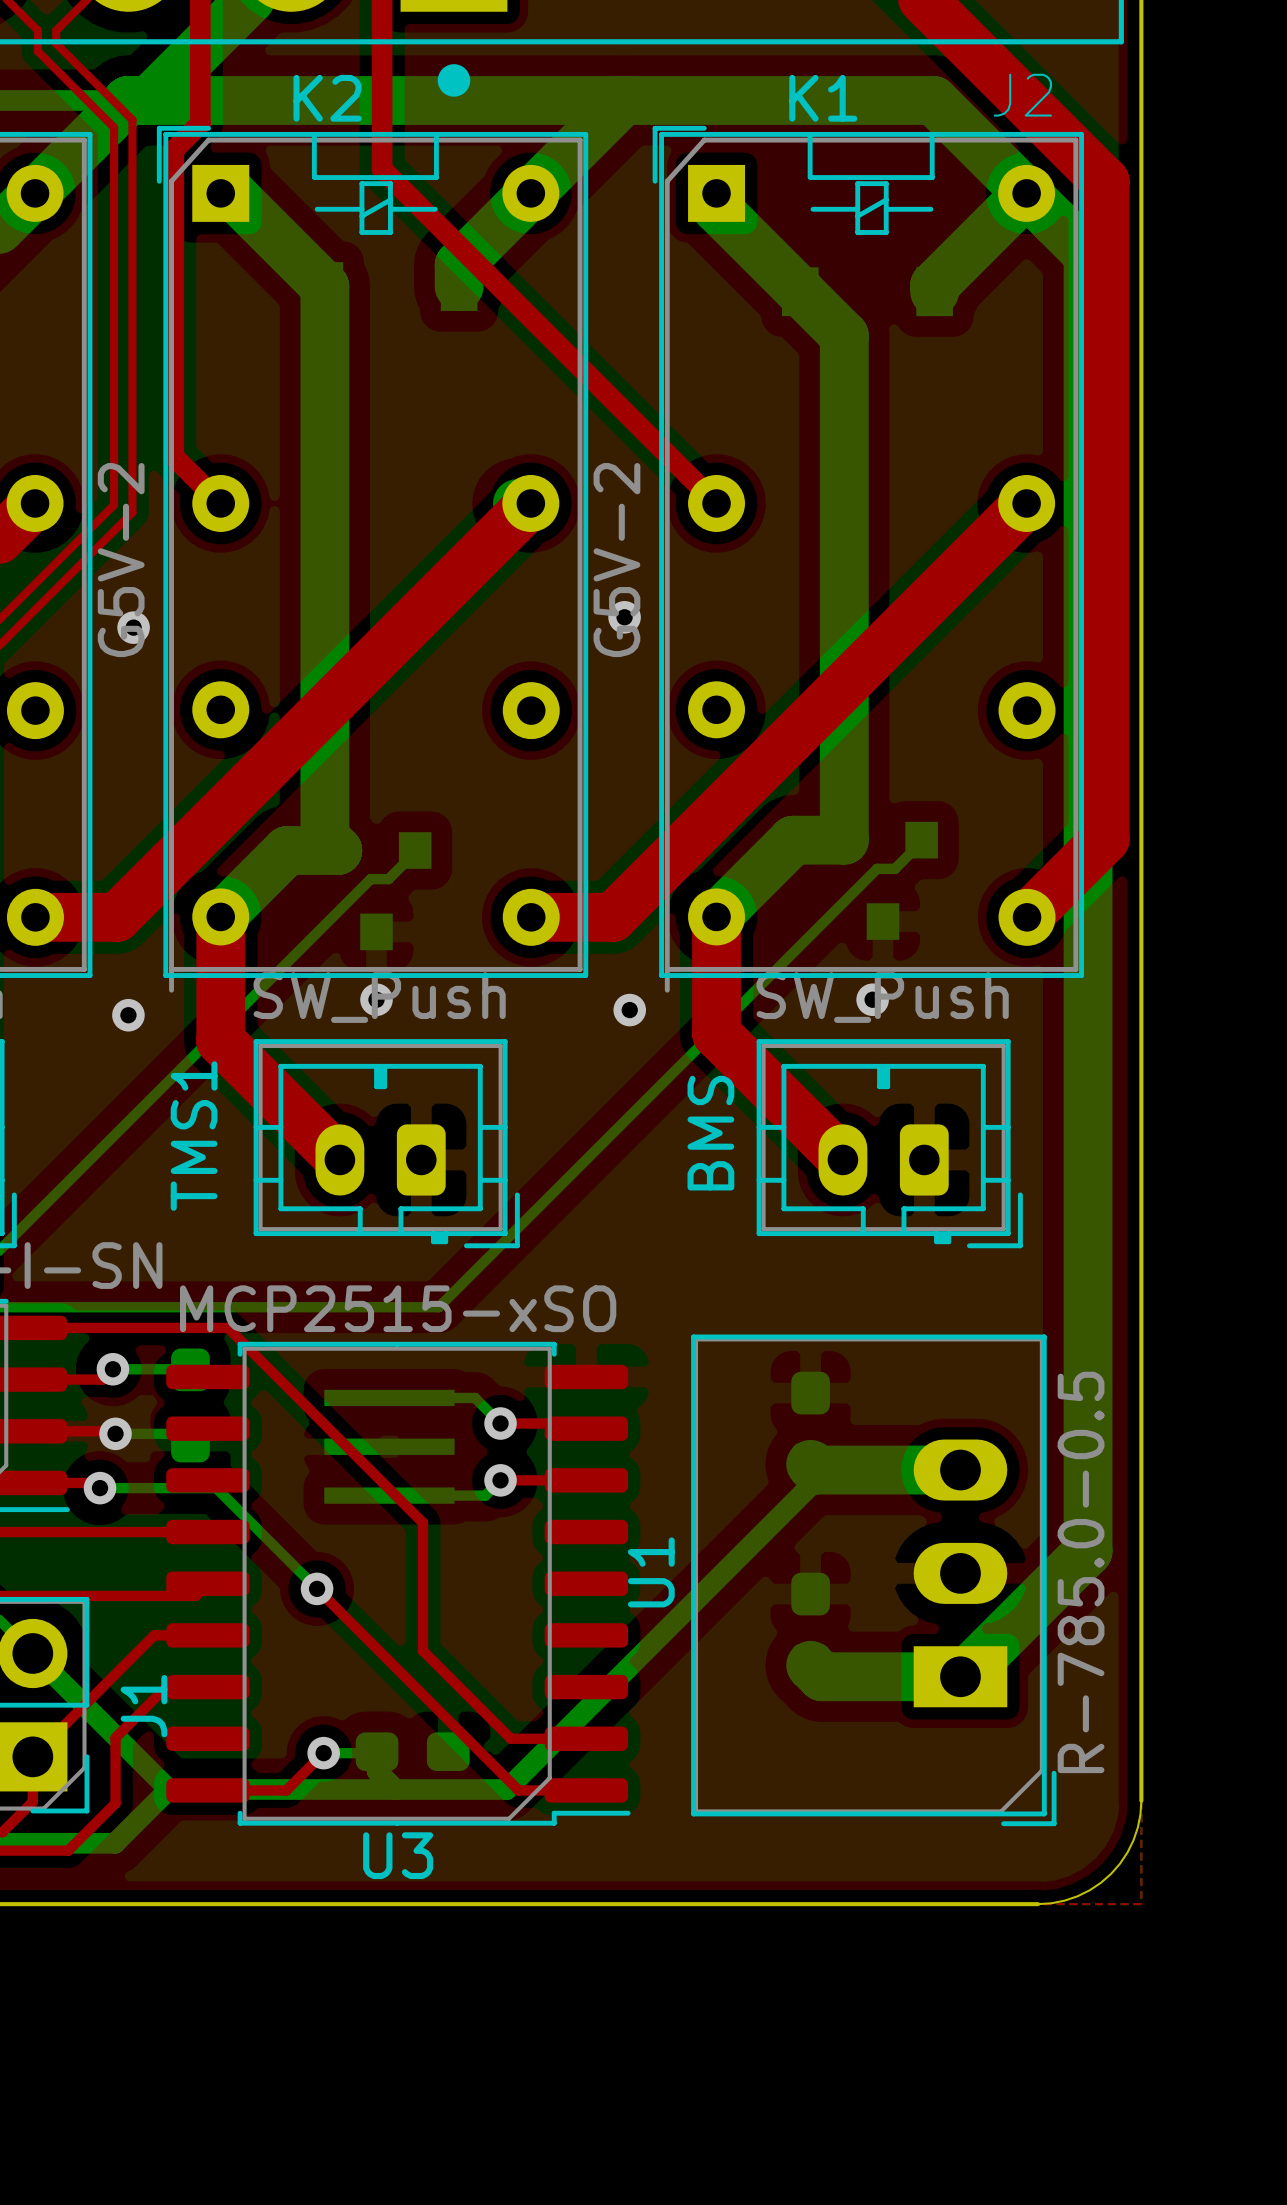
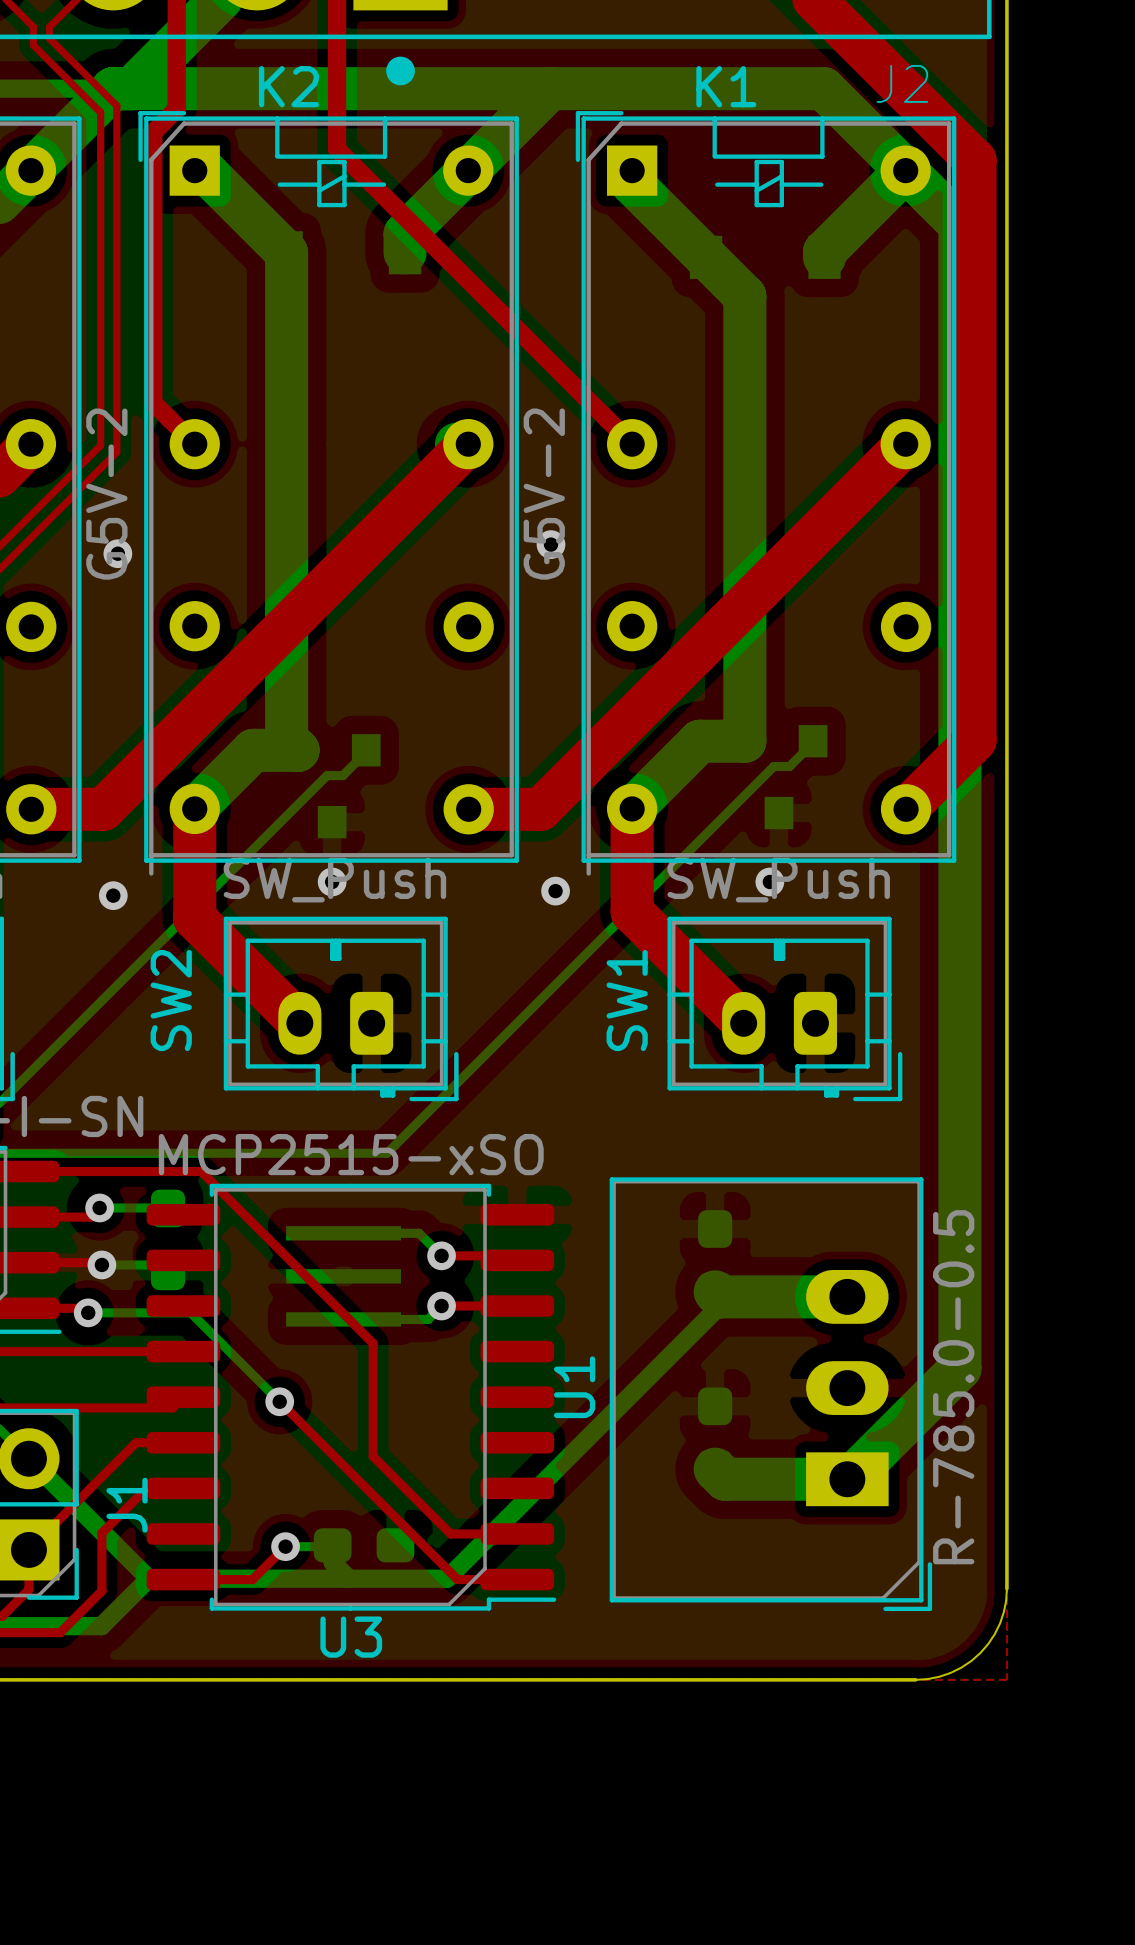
BMS name: BMS (710, 1133) -> SW1 (627, 1000)
TMS1 name: TMS1 (194, 1136) -> SW2 (171, 1000)

